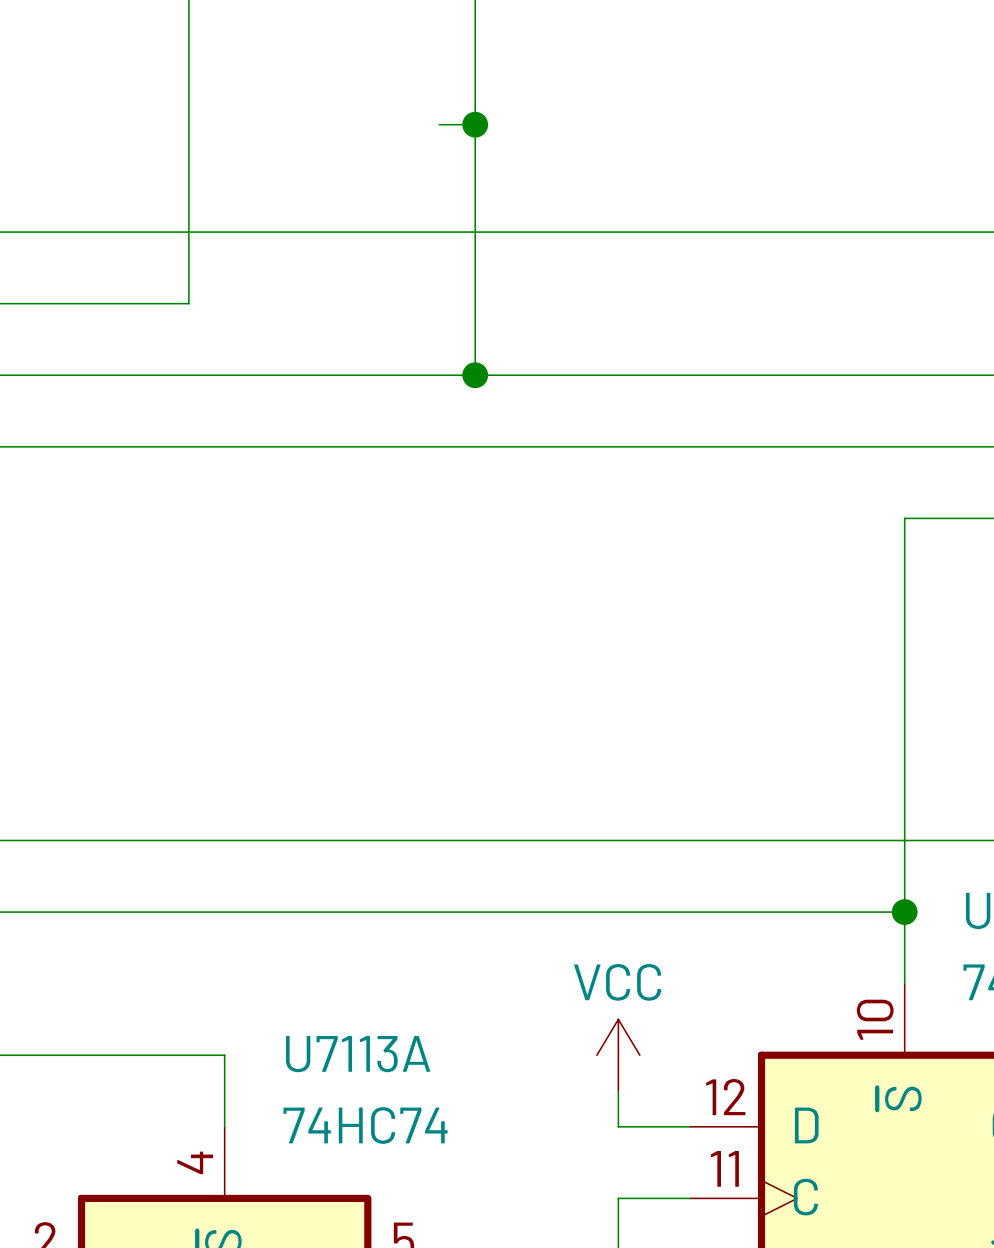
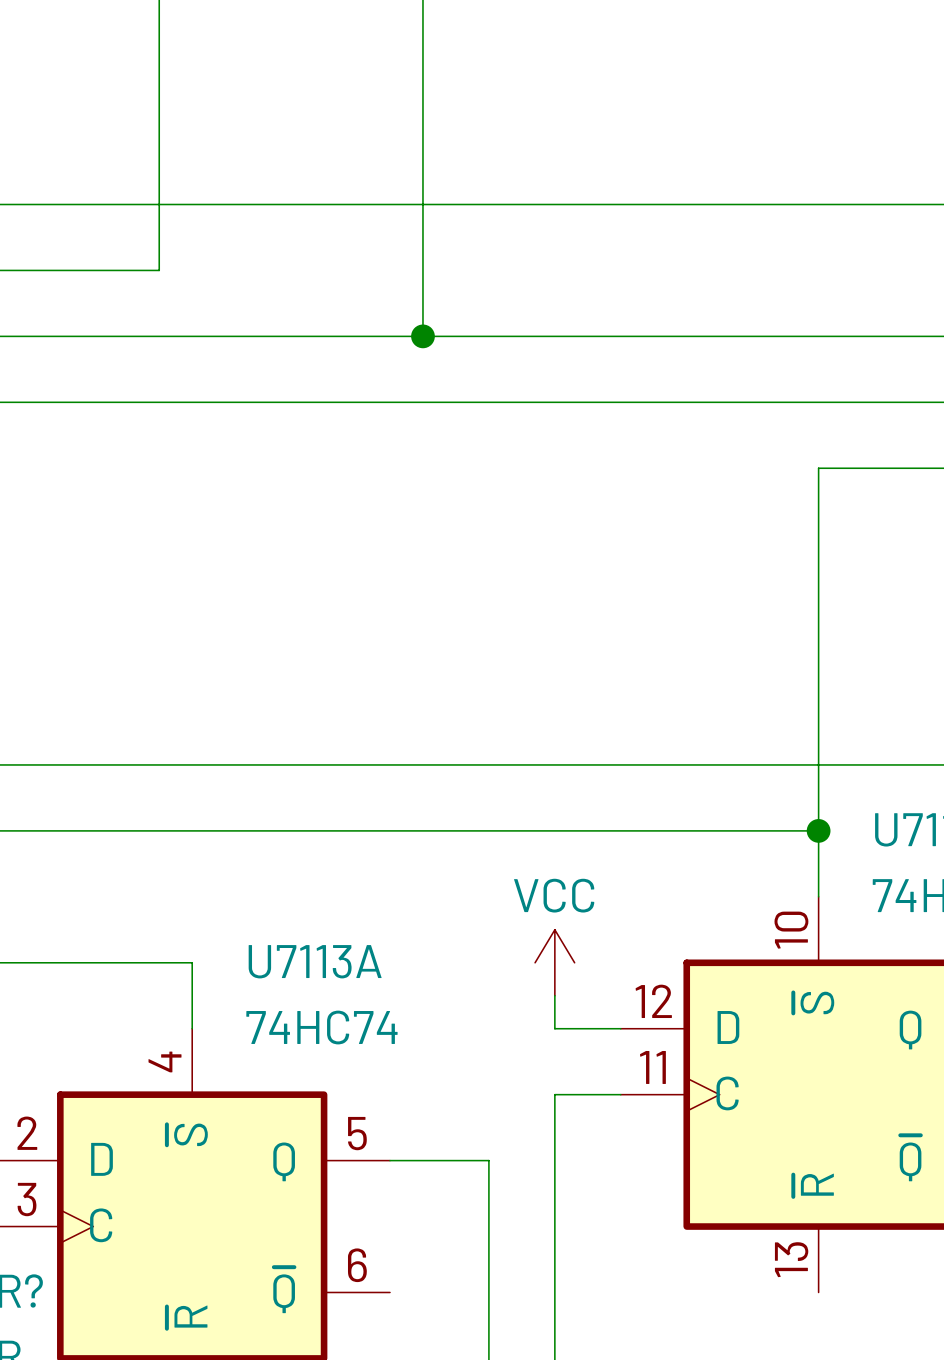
wire: (439, 124) (475, 124) -> none
junction: (475, 124) -> none

